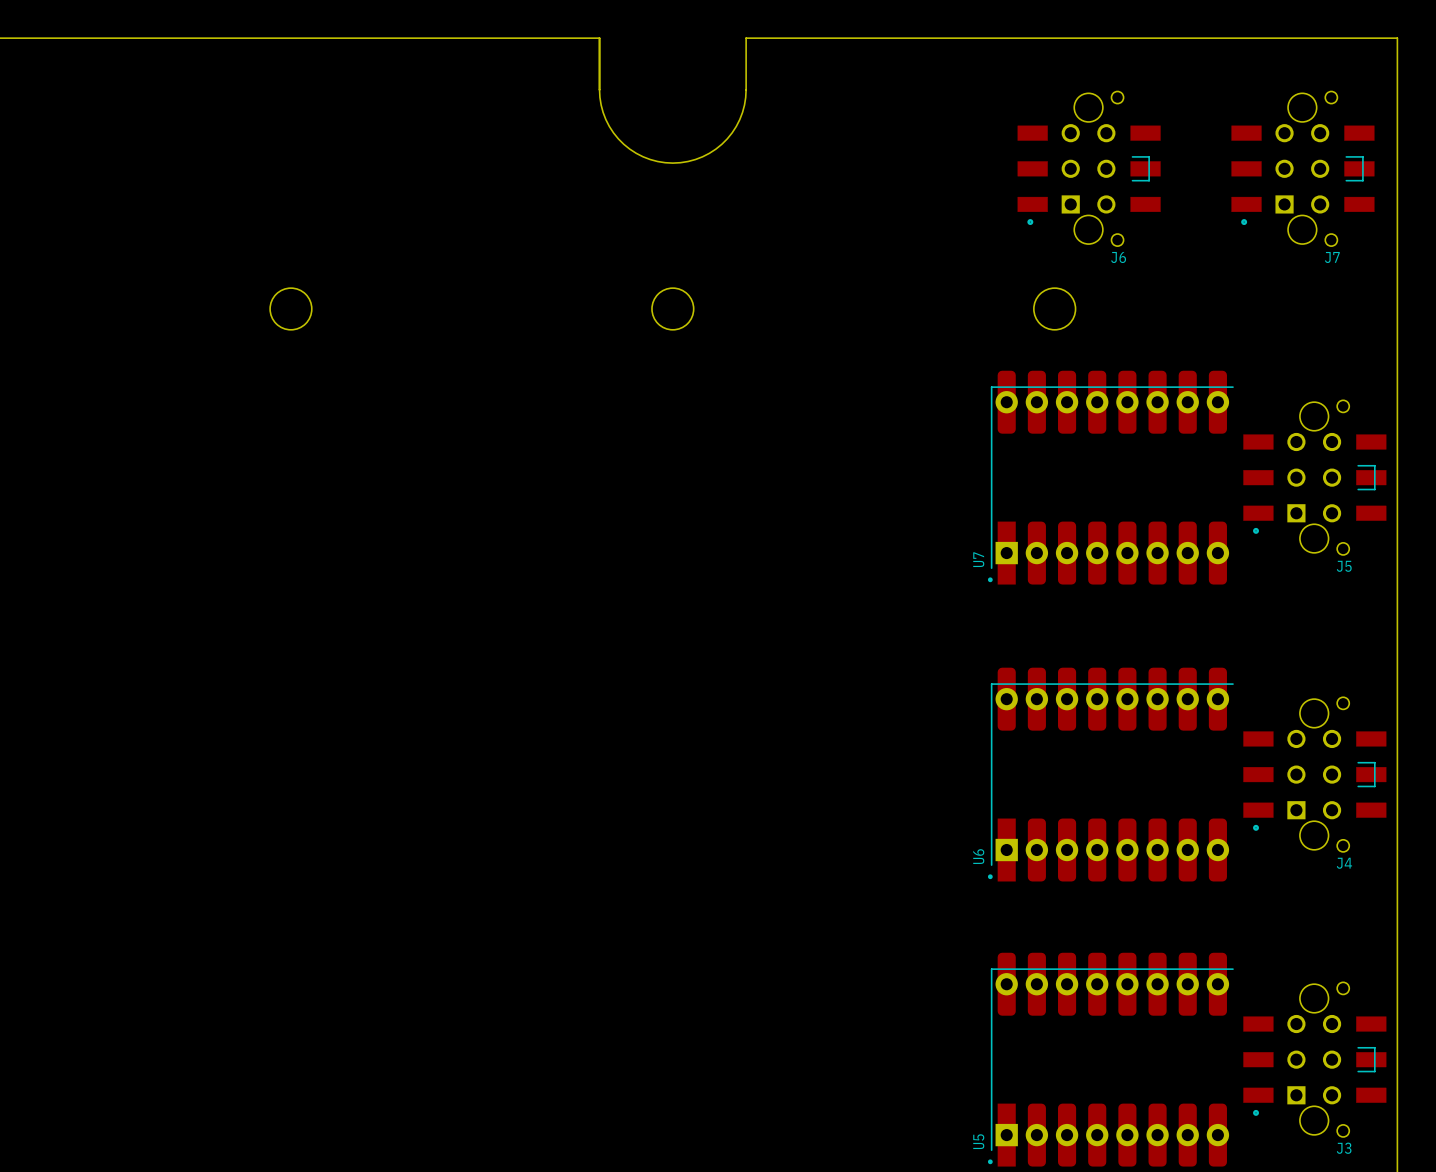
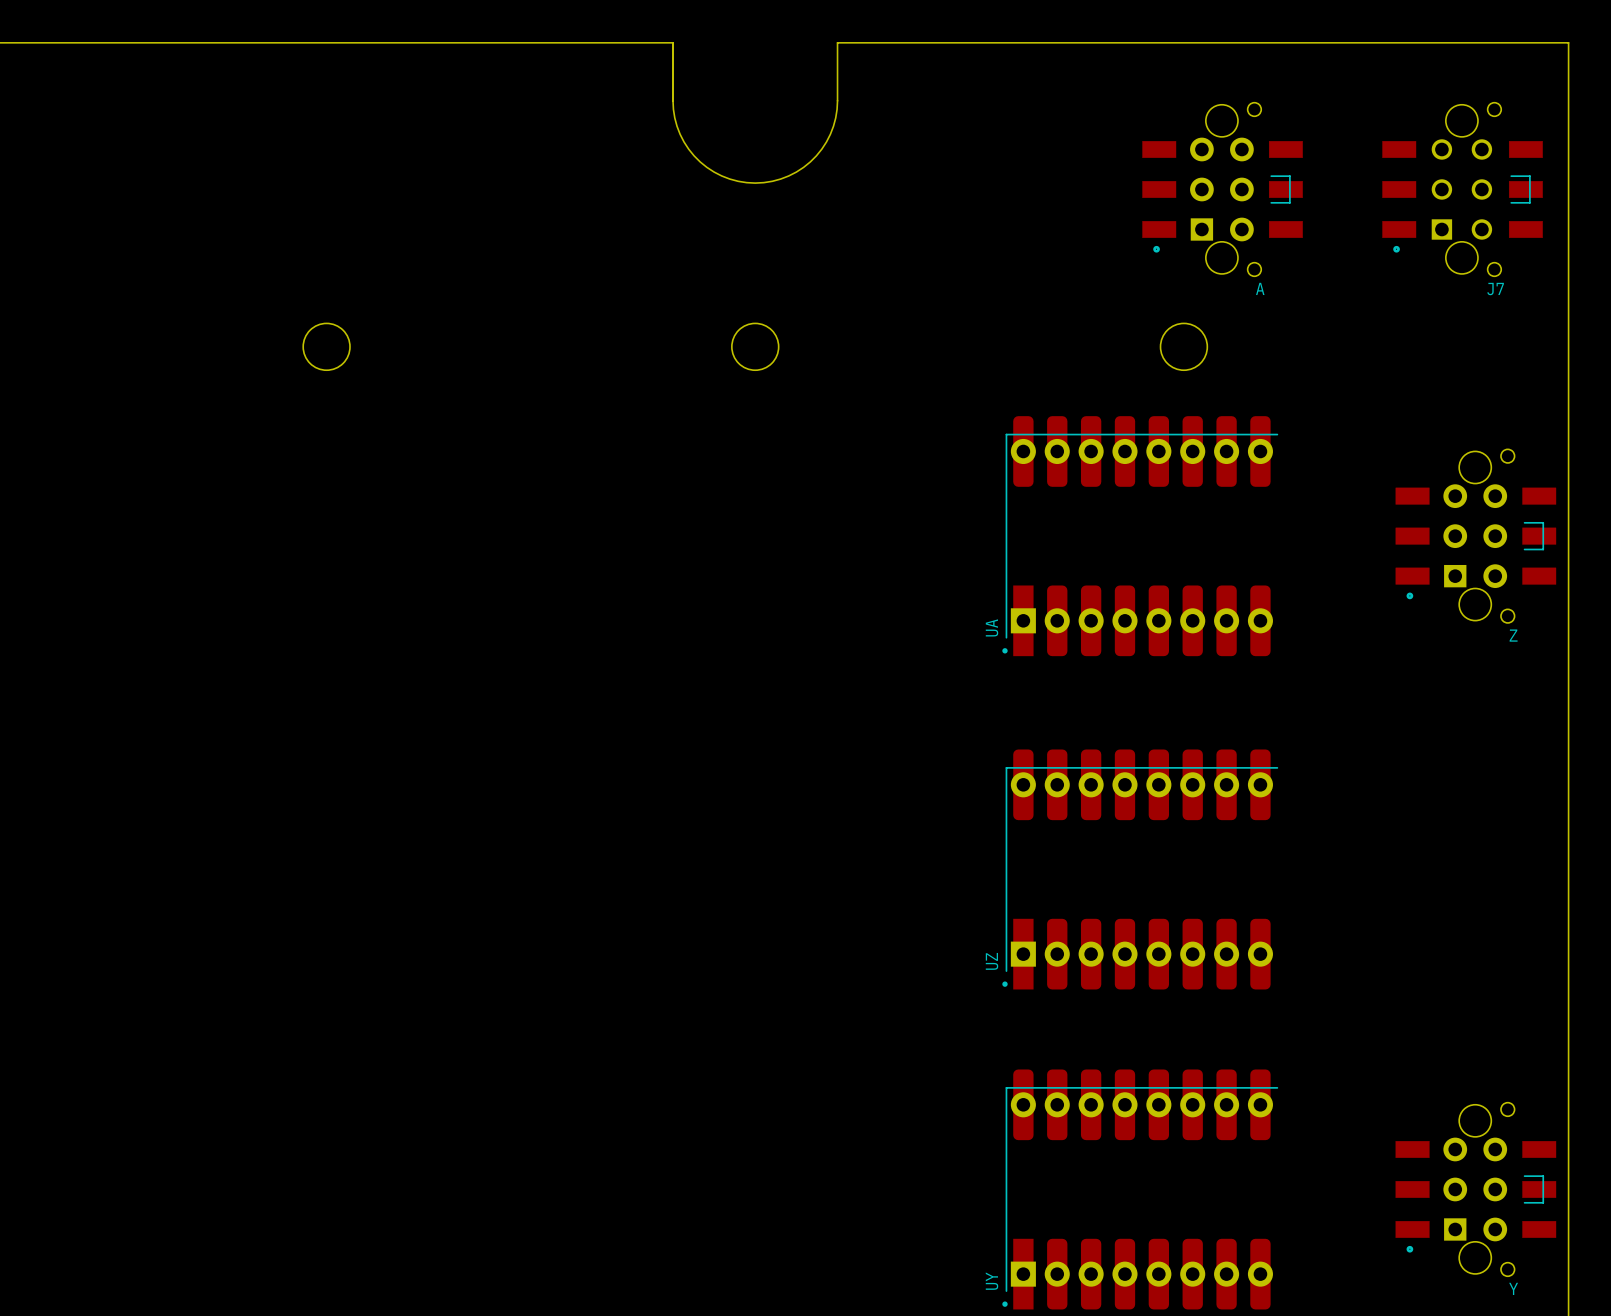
J6: (1089, 168) -> none
A: none -> (1222, 189)
UA: none -> (1140, 536)
U7: (1110, 477) -> none
J5: (1314, 477) -> none
Z: none -> (1475, 536)
UZ: none -> (1140, 869)
U6: (1110, 774) -> none
J4: (1314, 774) -> none
UY: none -> (1140, 1189)
U5: (1110, 1059) -> none
J3: (1314, 1059) -> none
Y: none -> (1475, 1189)

